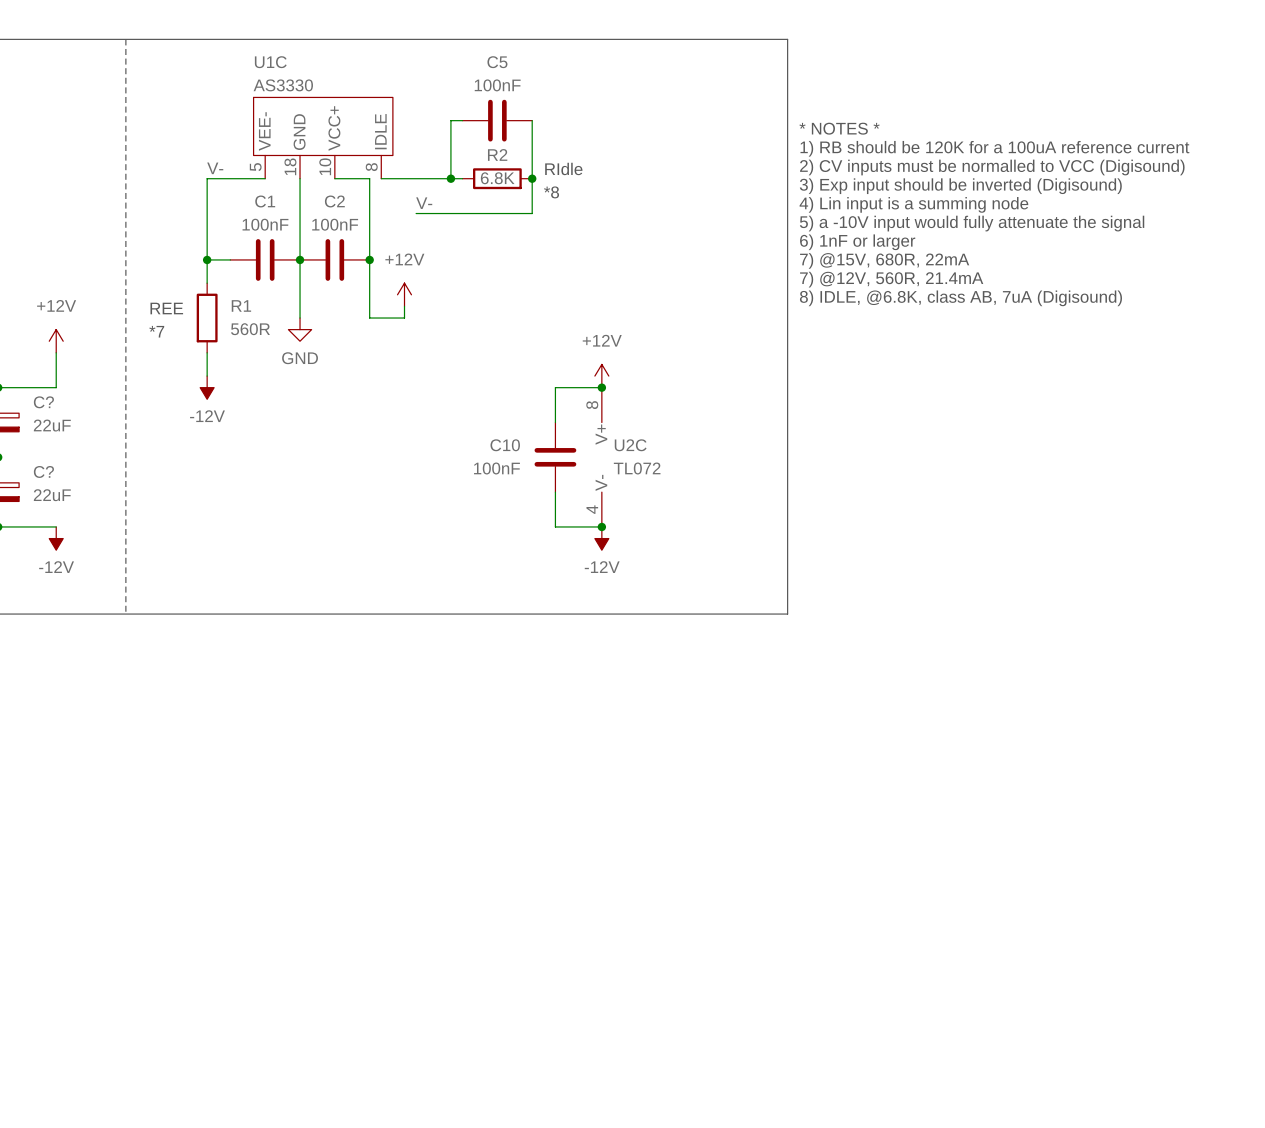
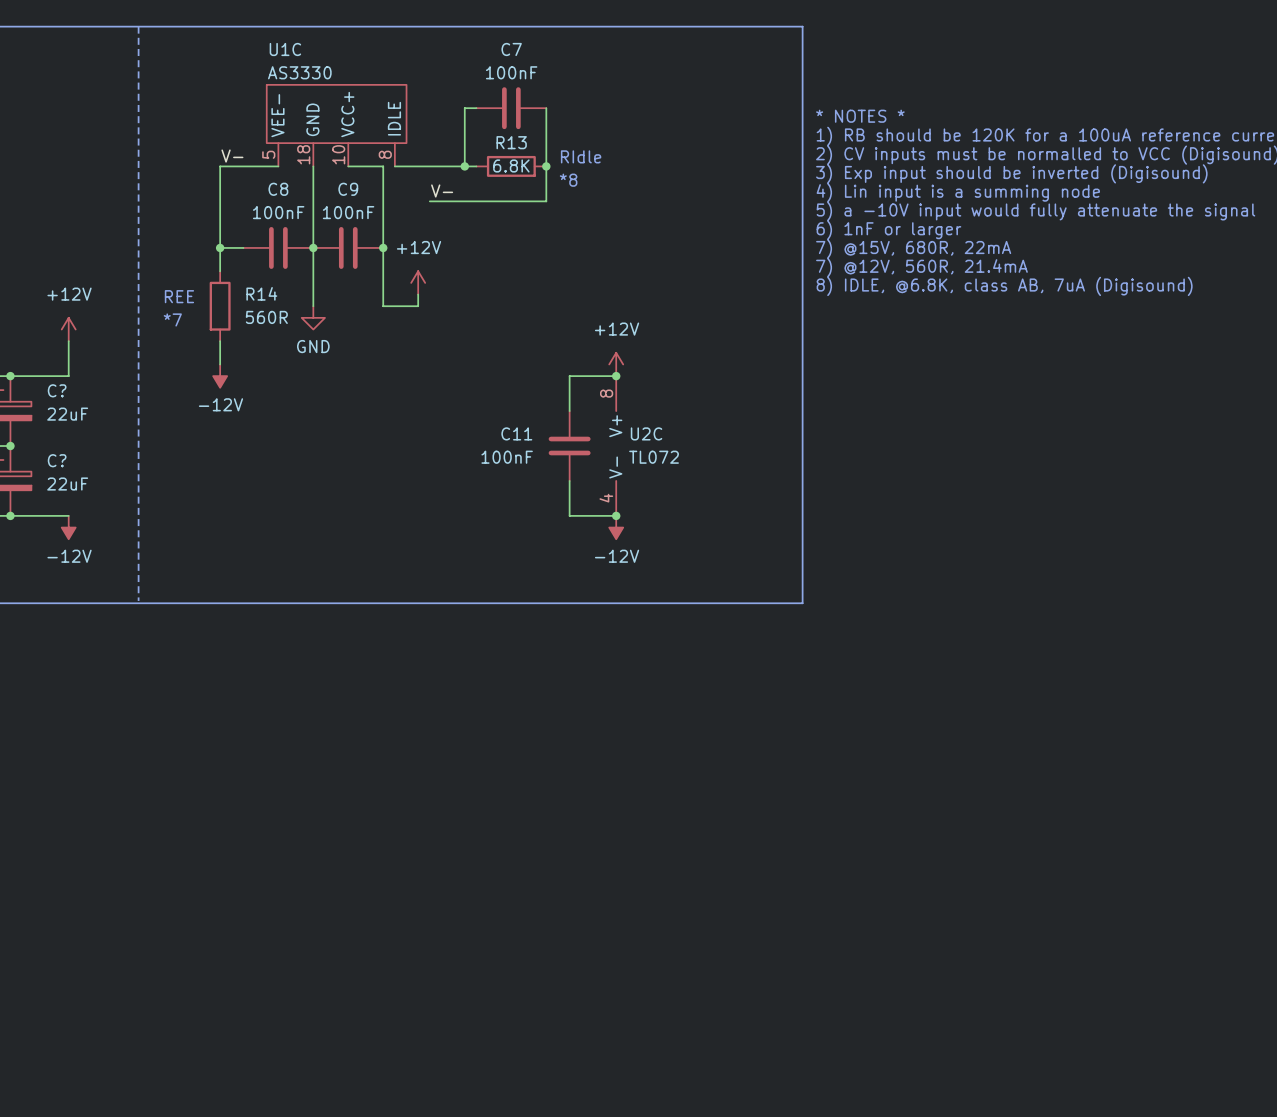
C5 name: C5 (497, 62) -> C7 (511, 49)
R2 name: R2 (497, 154) -> R13 (511, 142)
C1 name: C1 (265, 201) -> C8 (278, 189)
C2 name: C2 (334, 201) -> C9 (348, 189)
R1 name: R1 (241, 305) -> R14 (261, 293)
C10 name: C10 (505, 445) -> C11 (516, 433)

